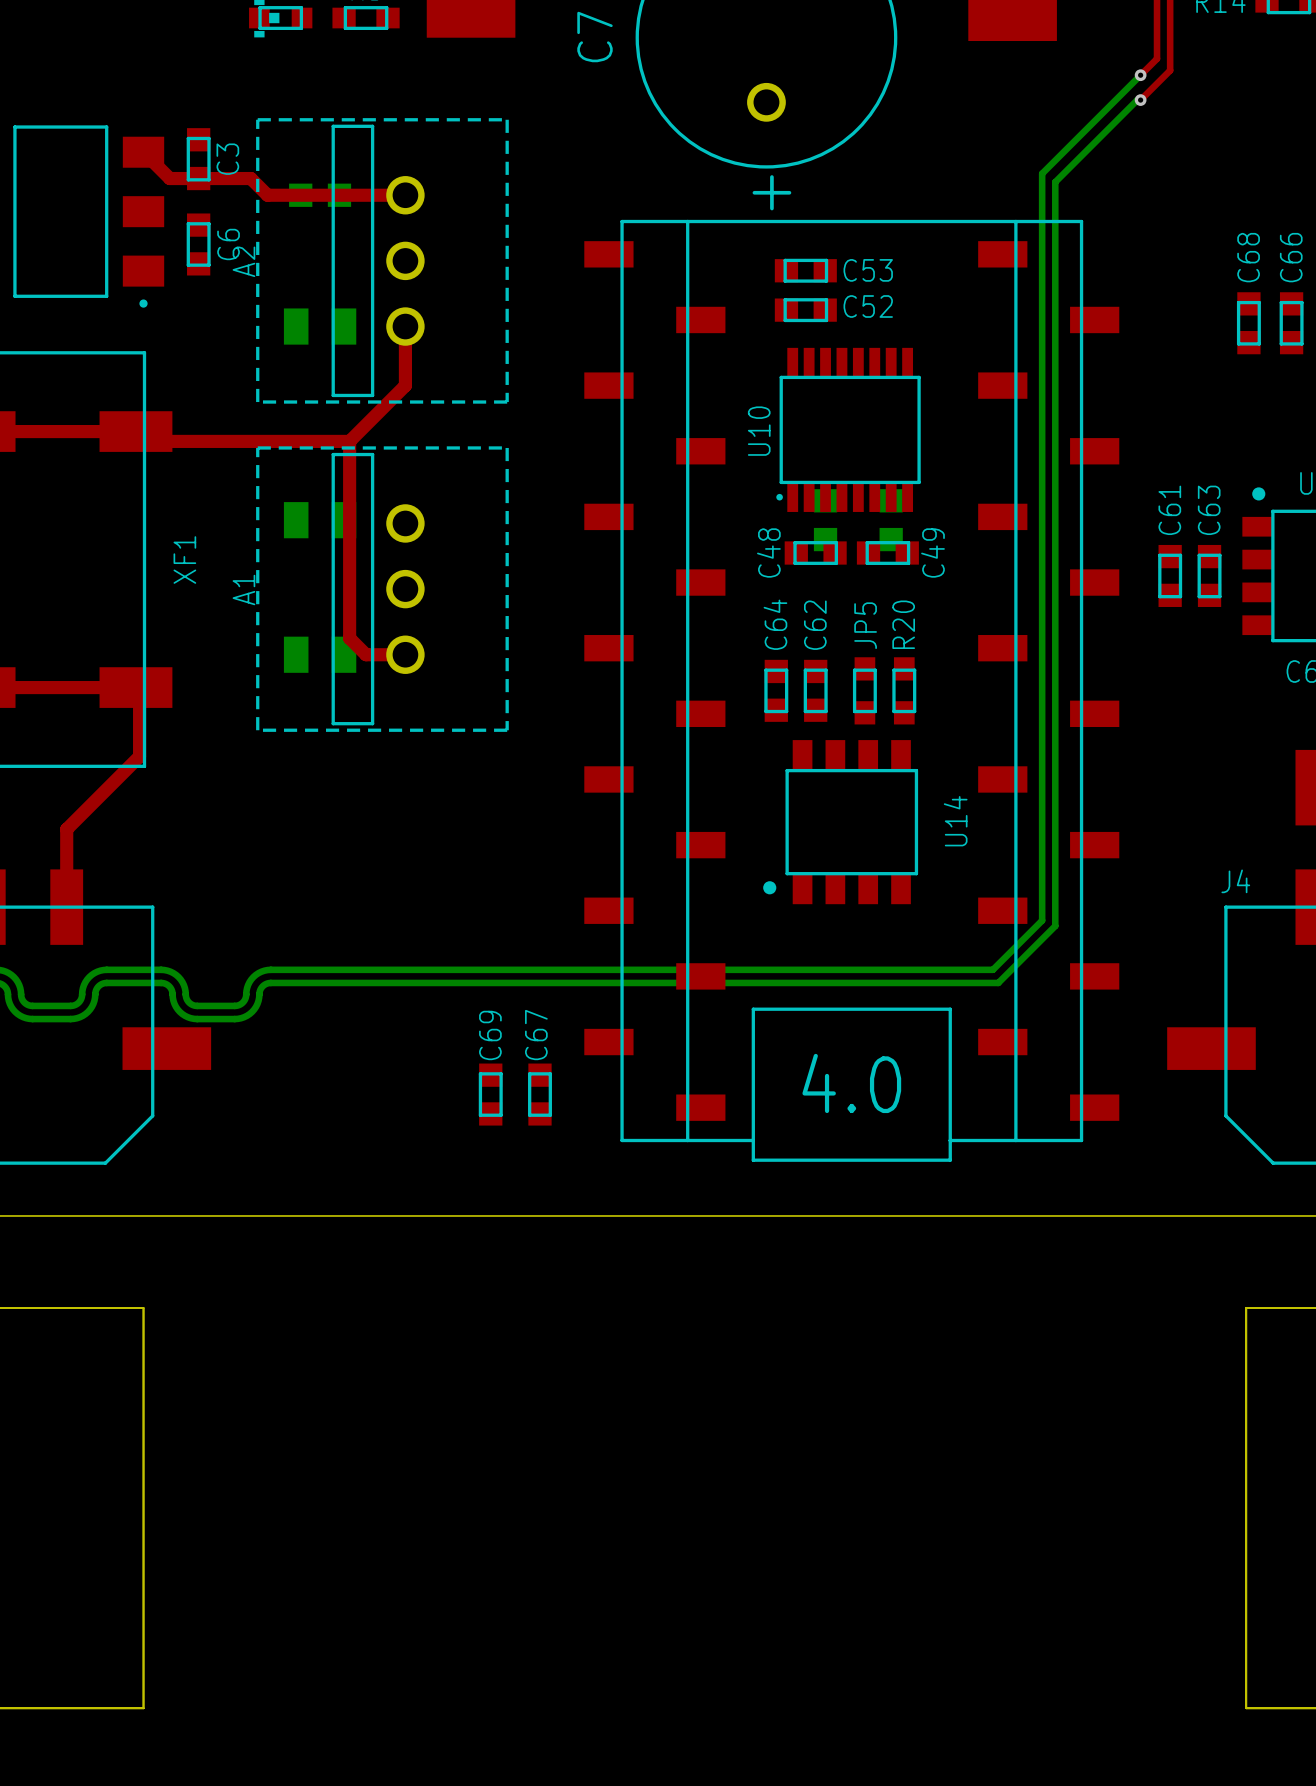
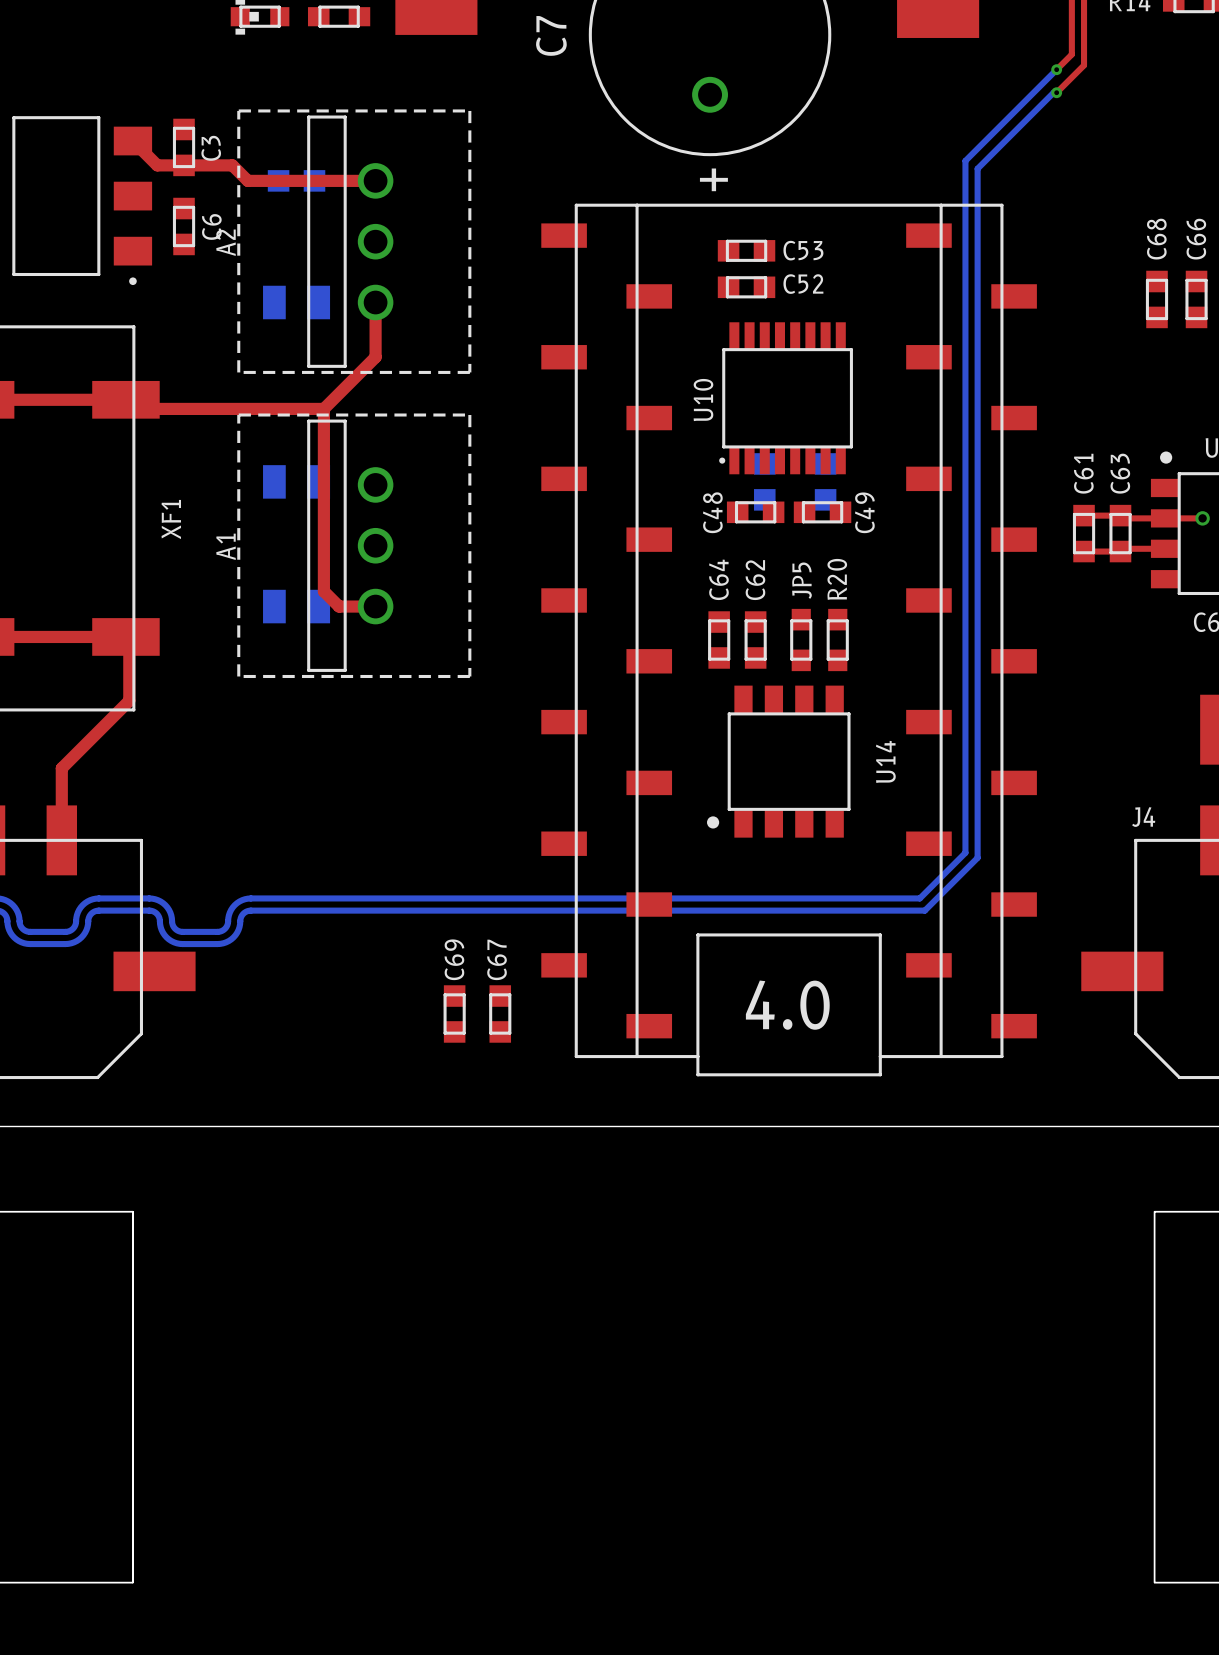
top track: none -> (1084, 515) (1120, 515) (1123, 518) (1202, 518)
via: none -> (1202, 518)
top track: none -> (1164, 548) (1084, 551)

